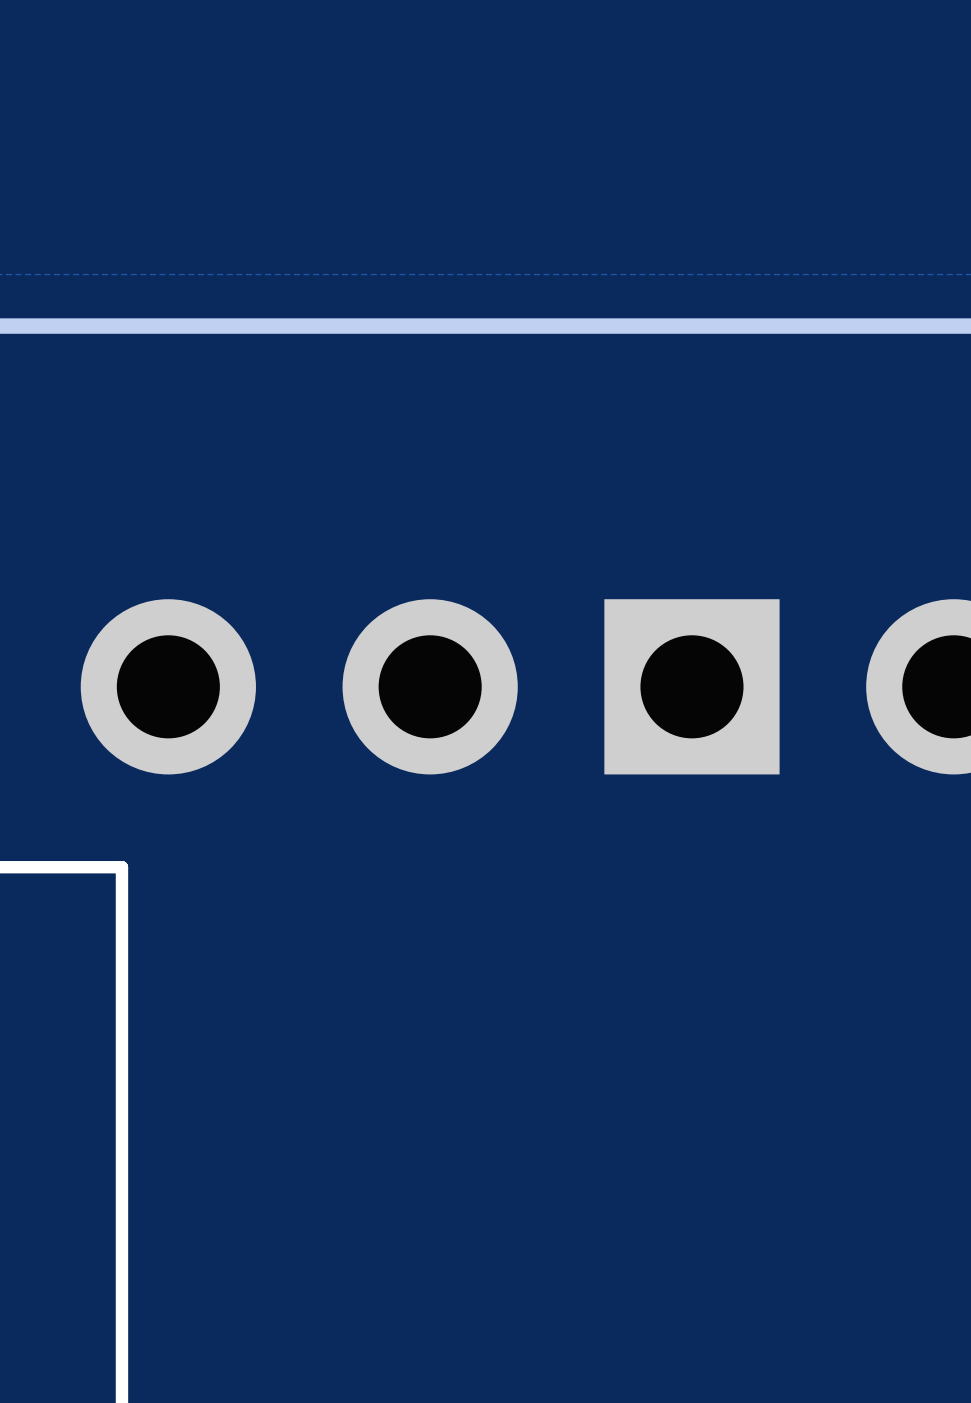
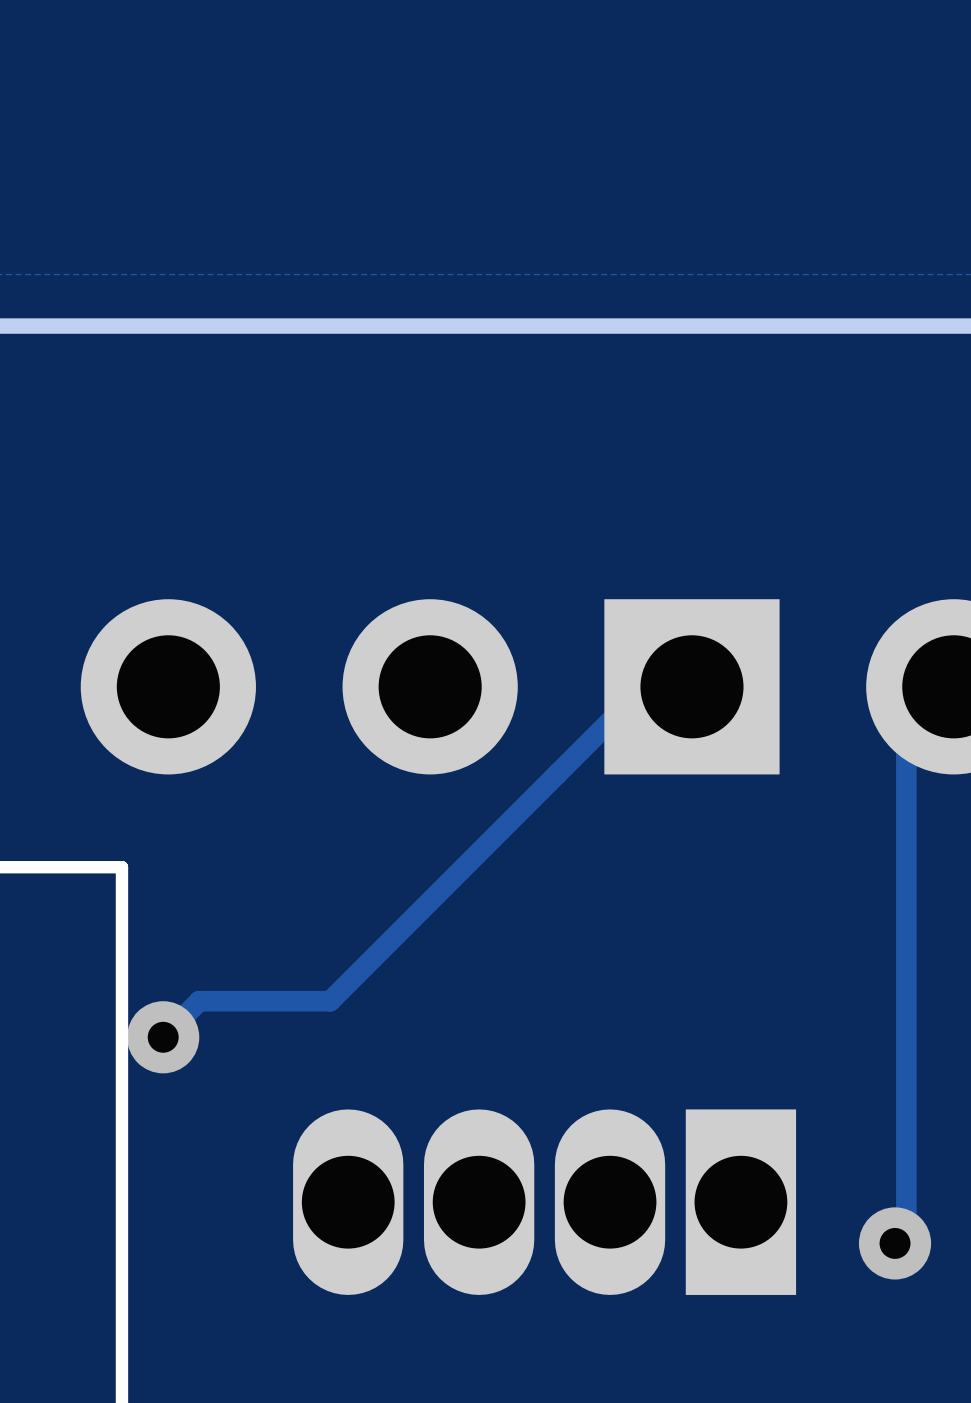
track: none -> (644, 686) (330, 1001) (199, 1001) (163, 1037)
track: none -> (906, 686) (906, 1232) (895, 1243)
via: none -> (163, 1037)
part: none -> (544, 1202)
via: none -> (895, 1243)

